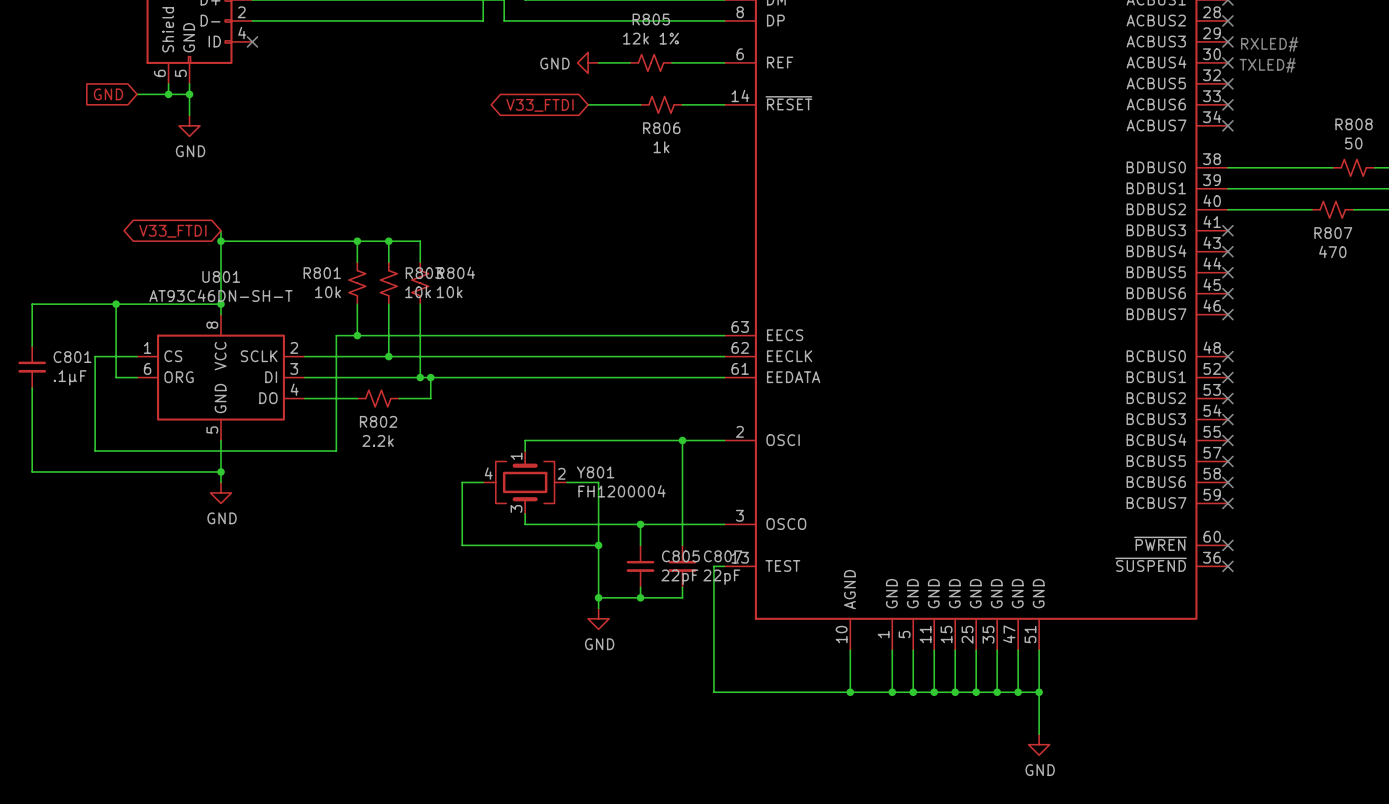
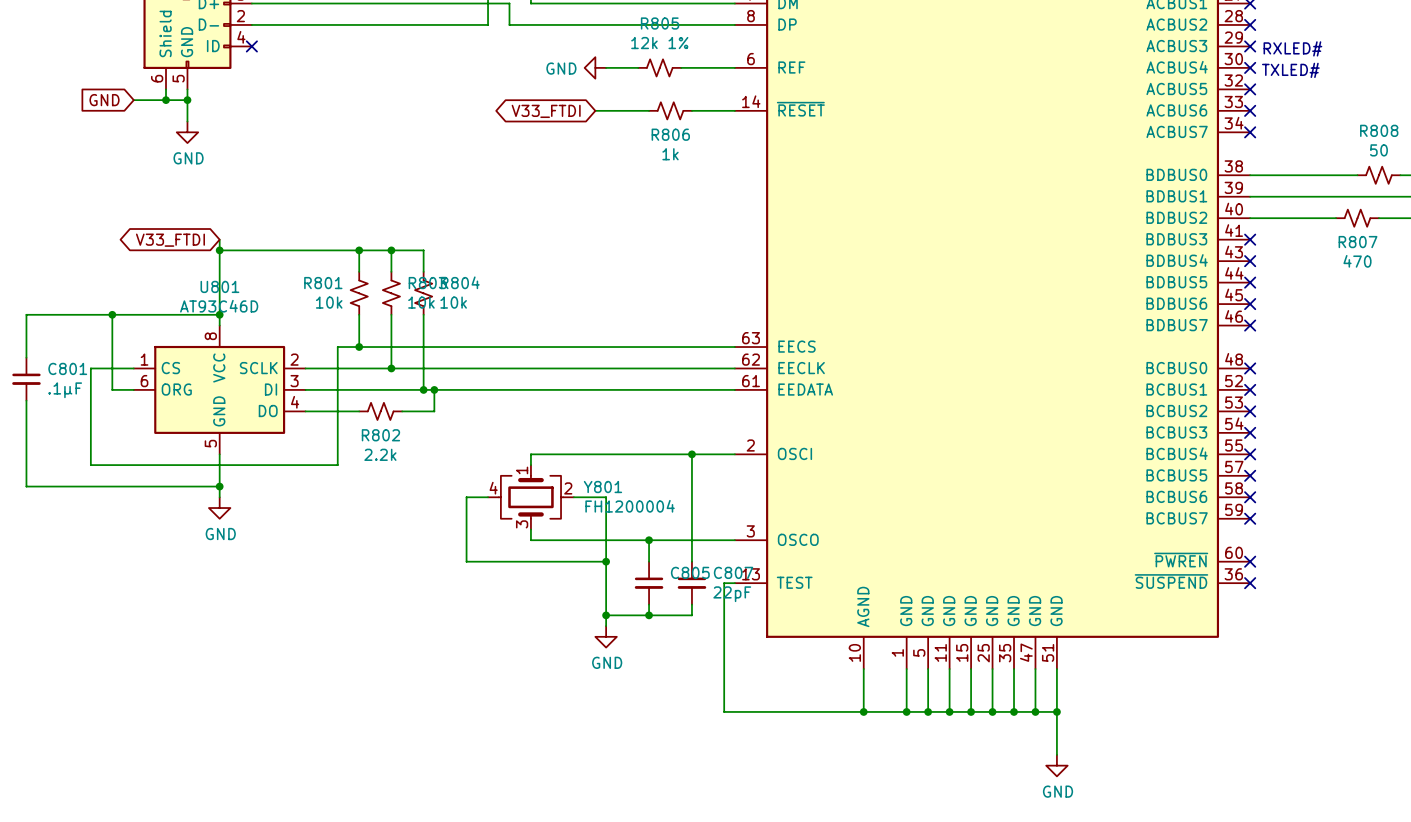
U801 value: AT93C46DN-SH-T (220, 295) -> AT93C46D (219, 306)
C805 value: 22pF (679, 577) -> none

